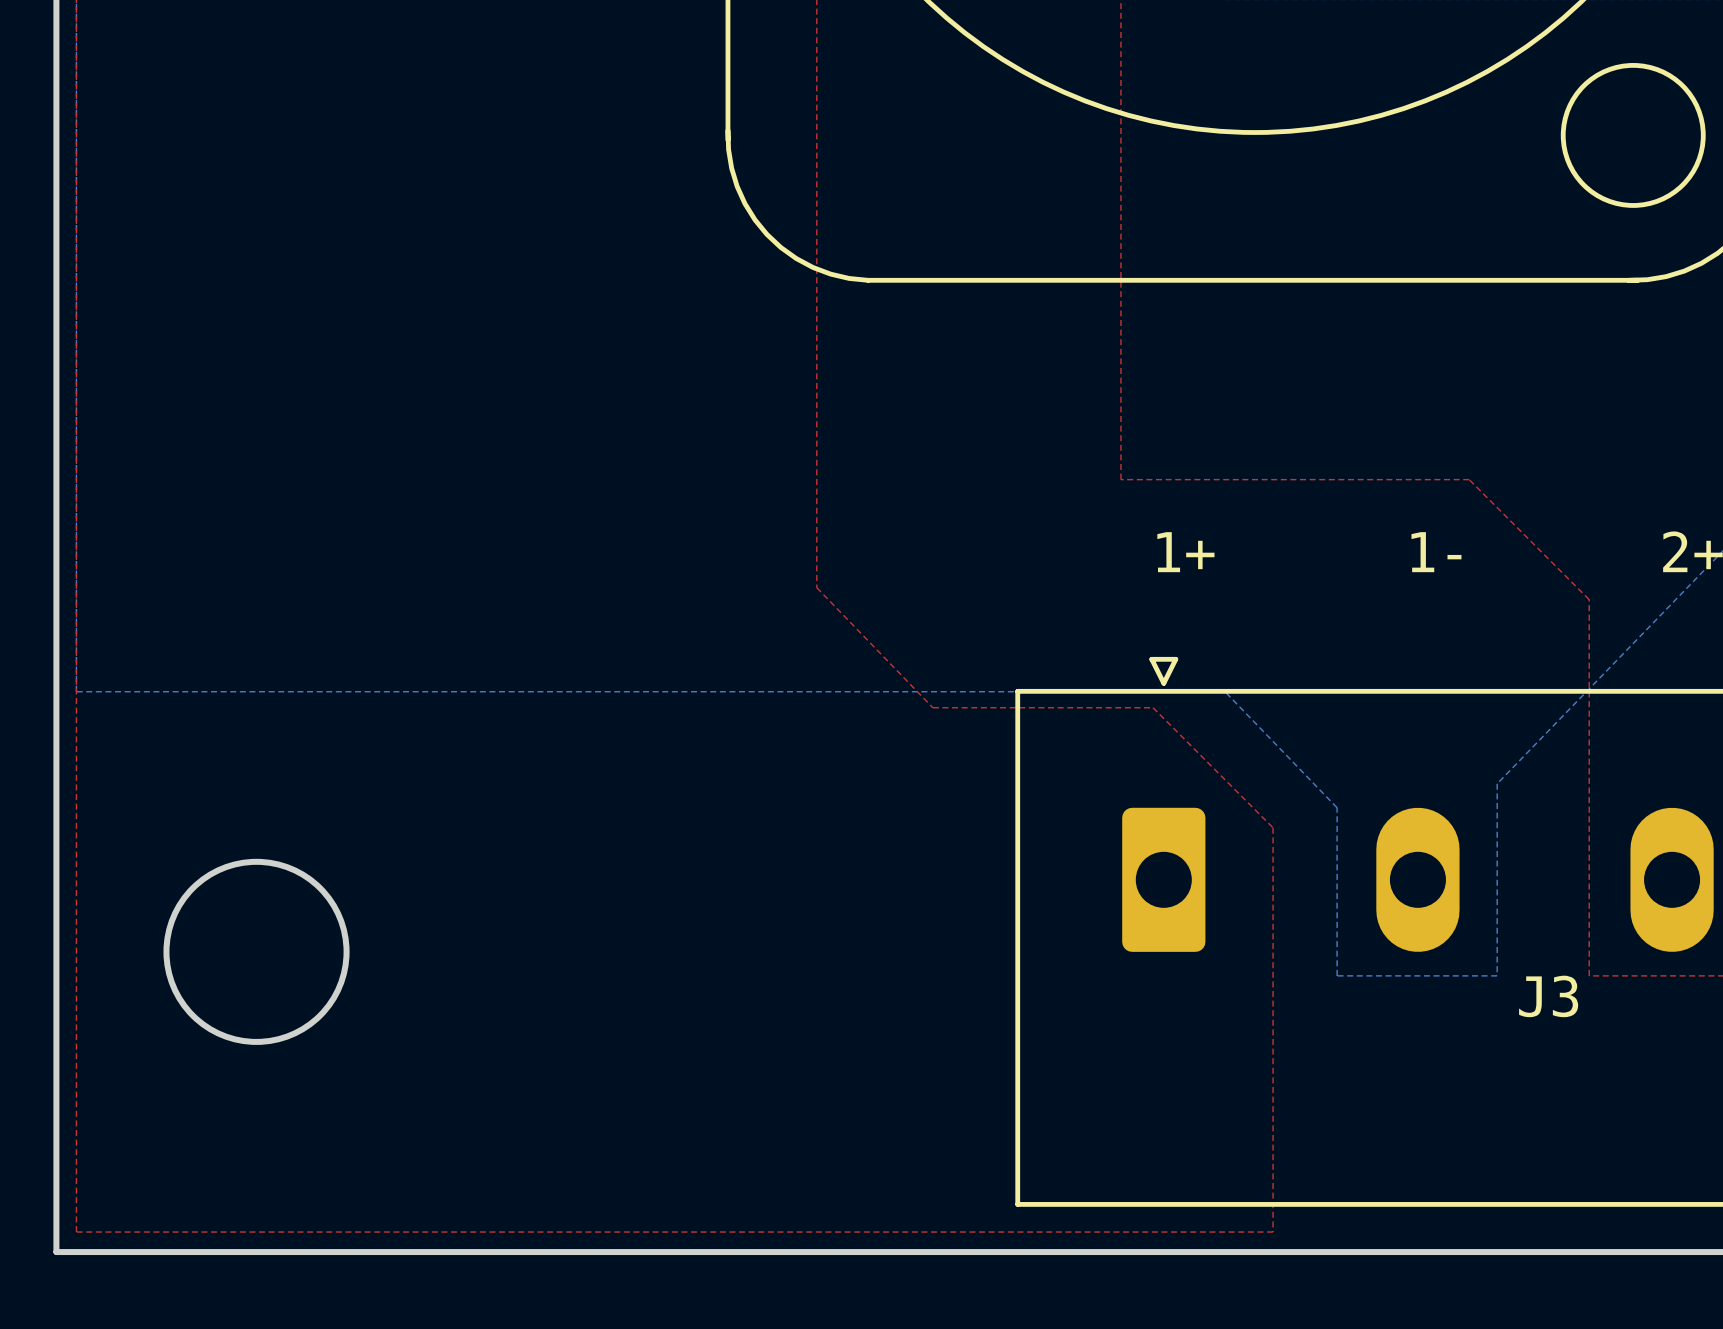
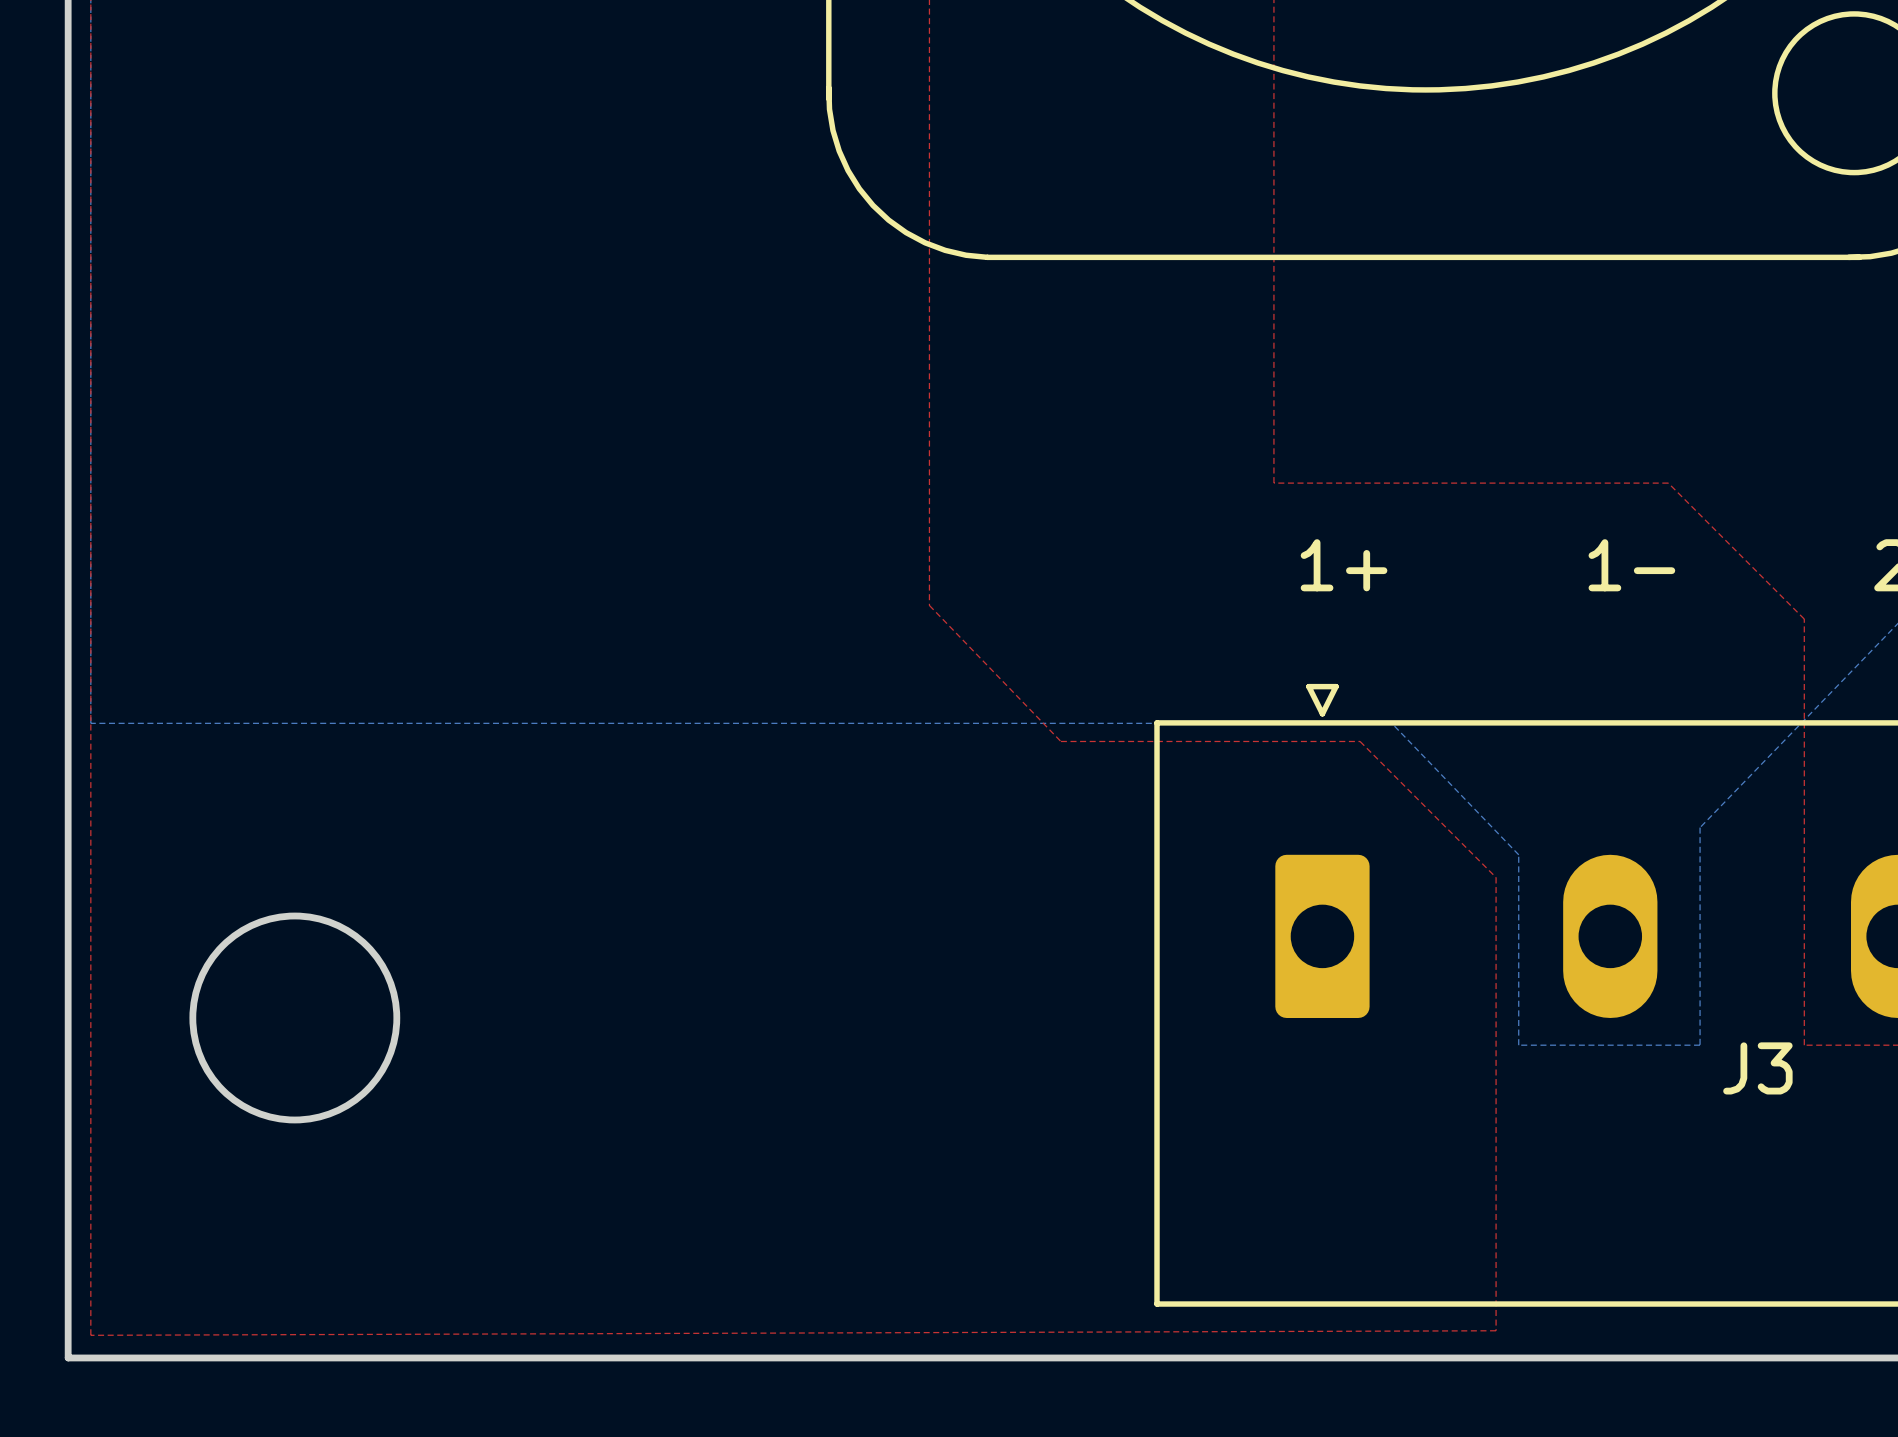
top zone outline: (1153, 707) (1273, 827) (1273, 1232) (76, 1232) -> (1310, 741) (1360, 741) (1496, 877) (1496, 1330) (90, 1335)

